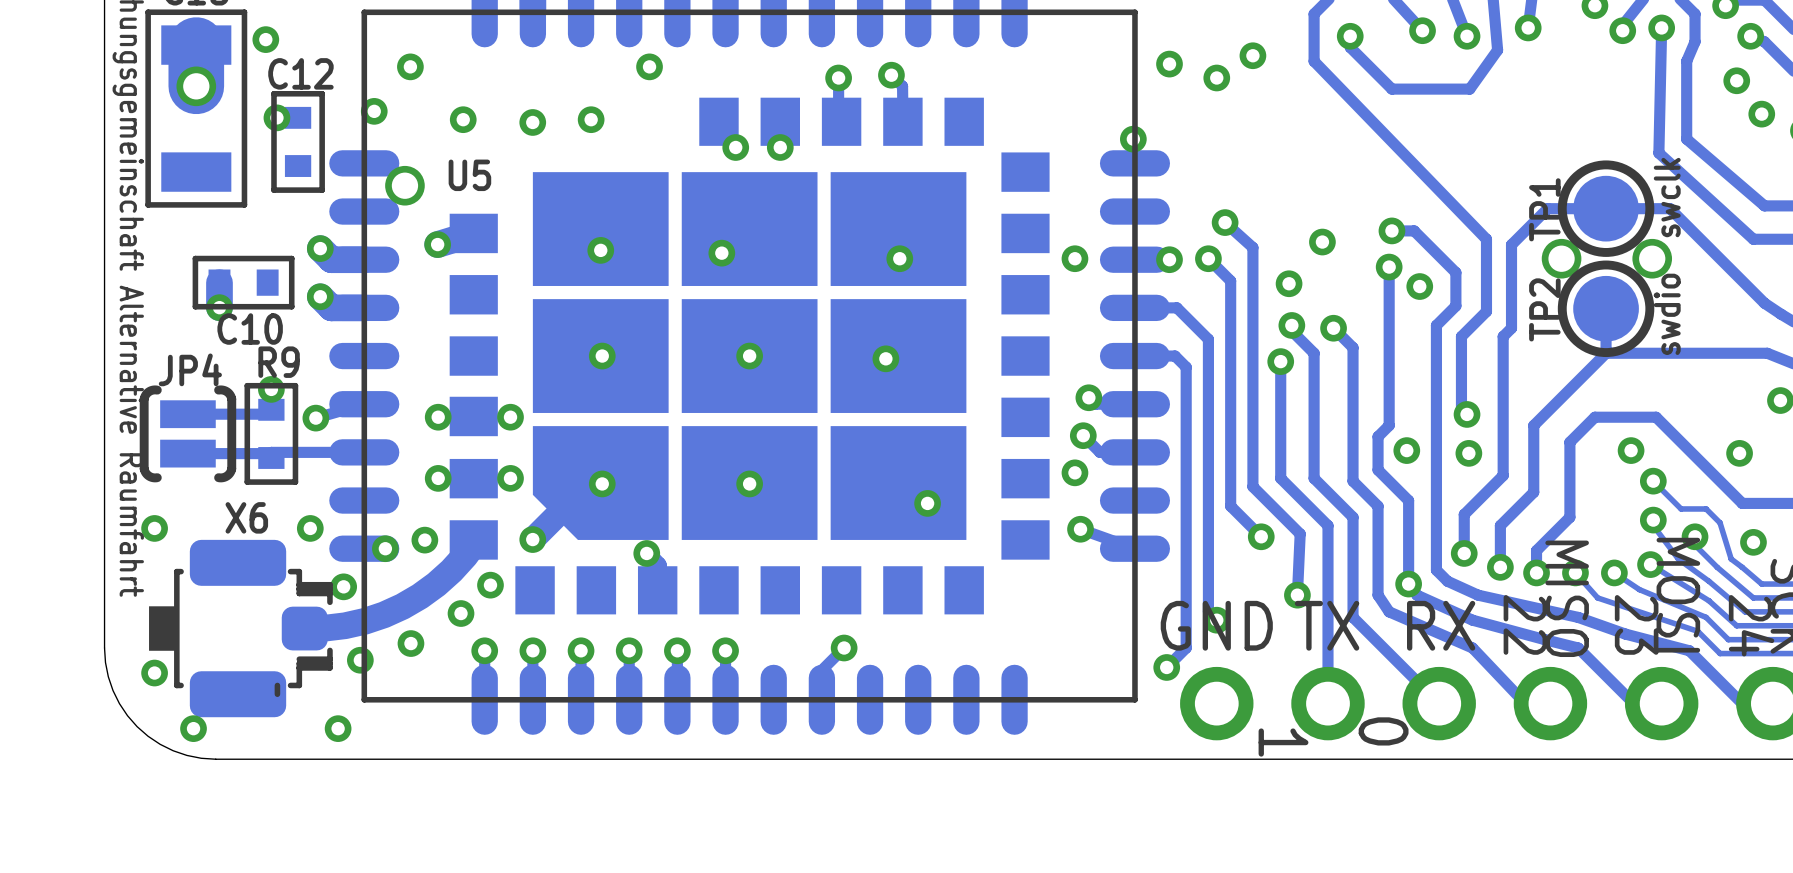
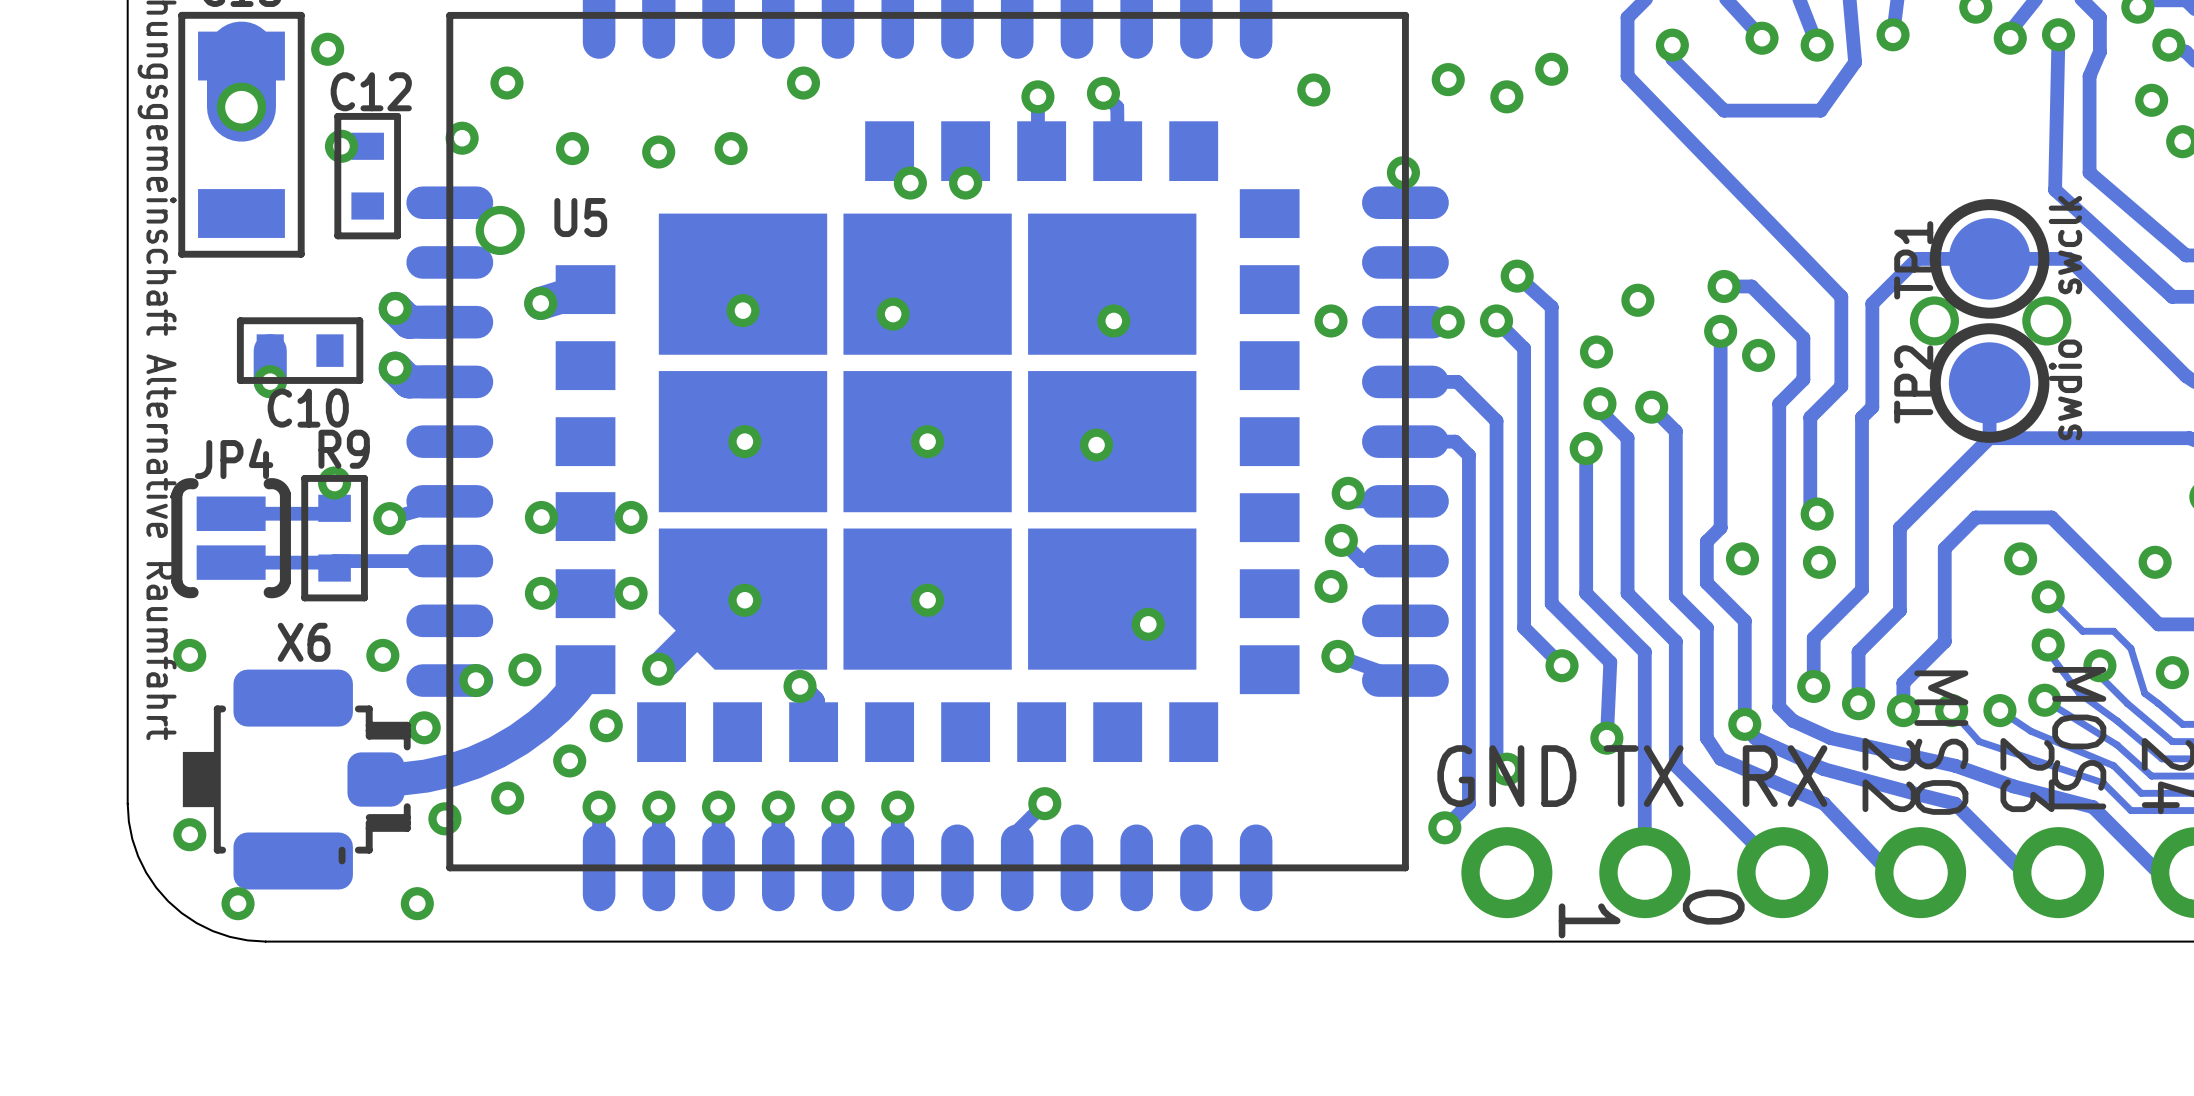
via: none -> (1313, 89)

